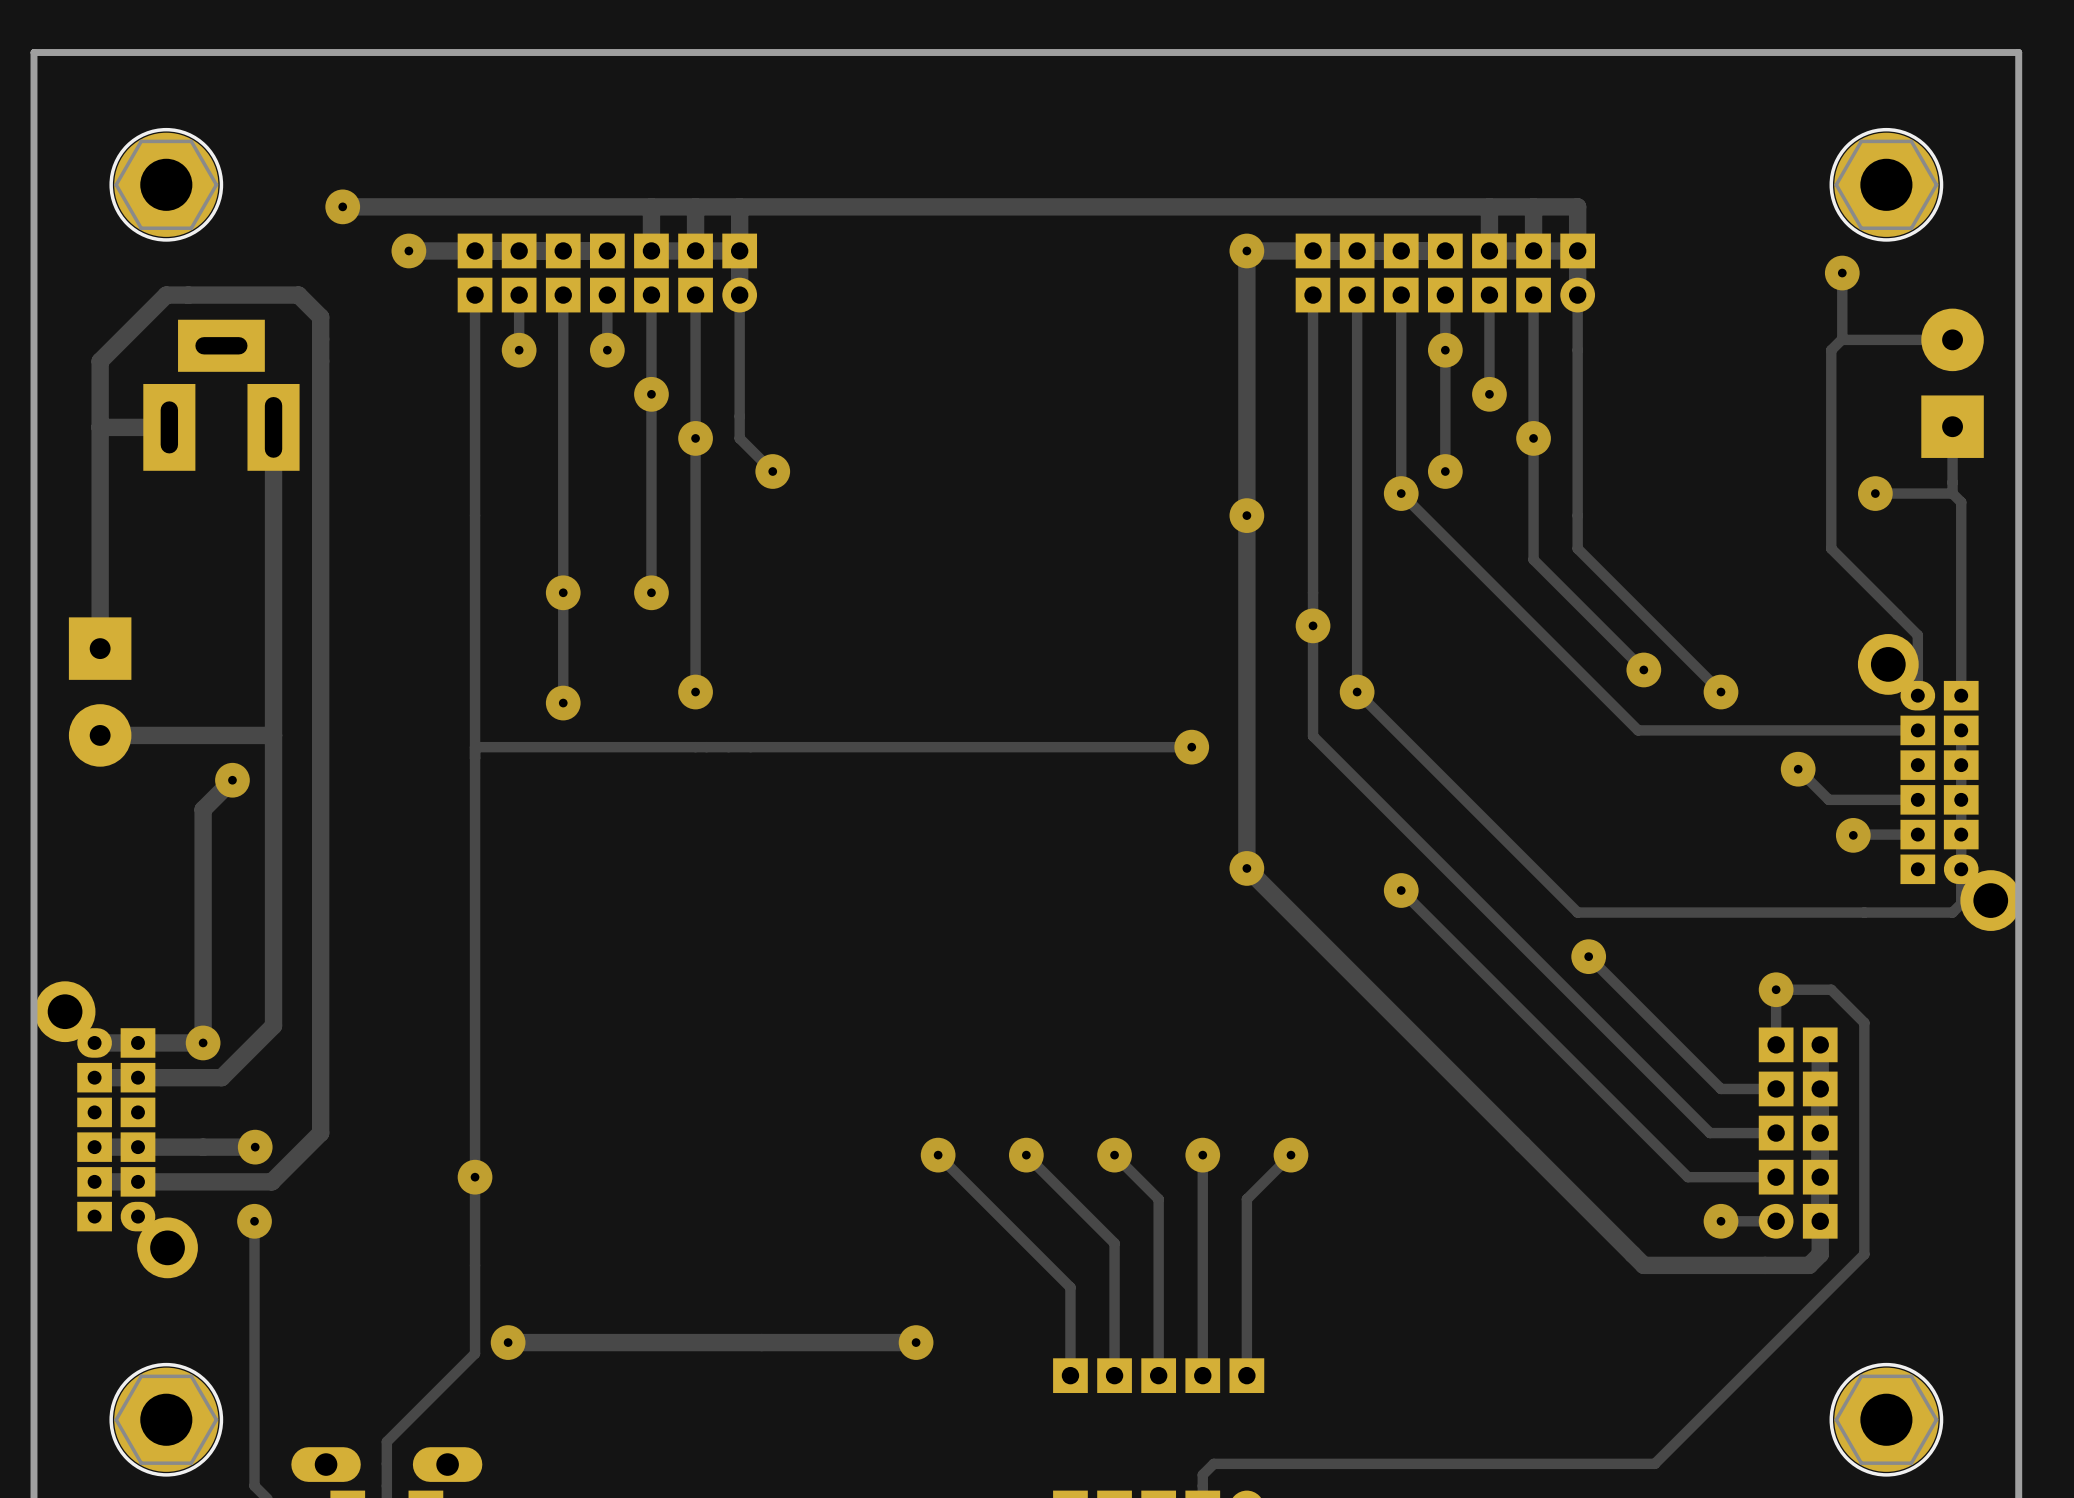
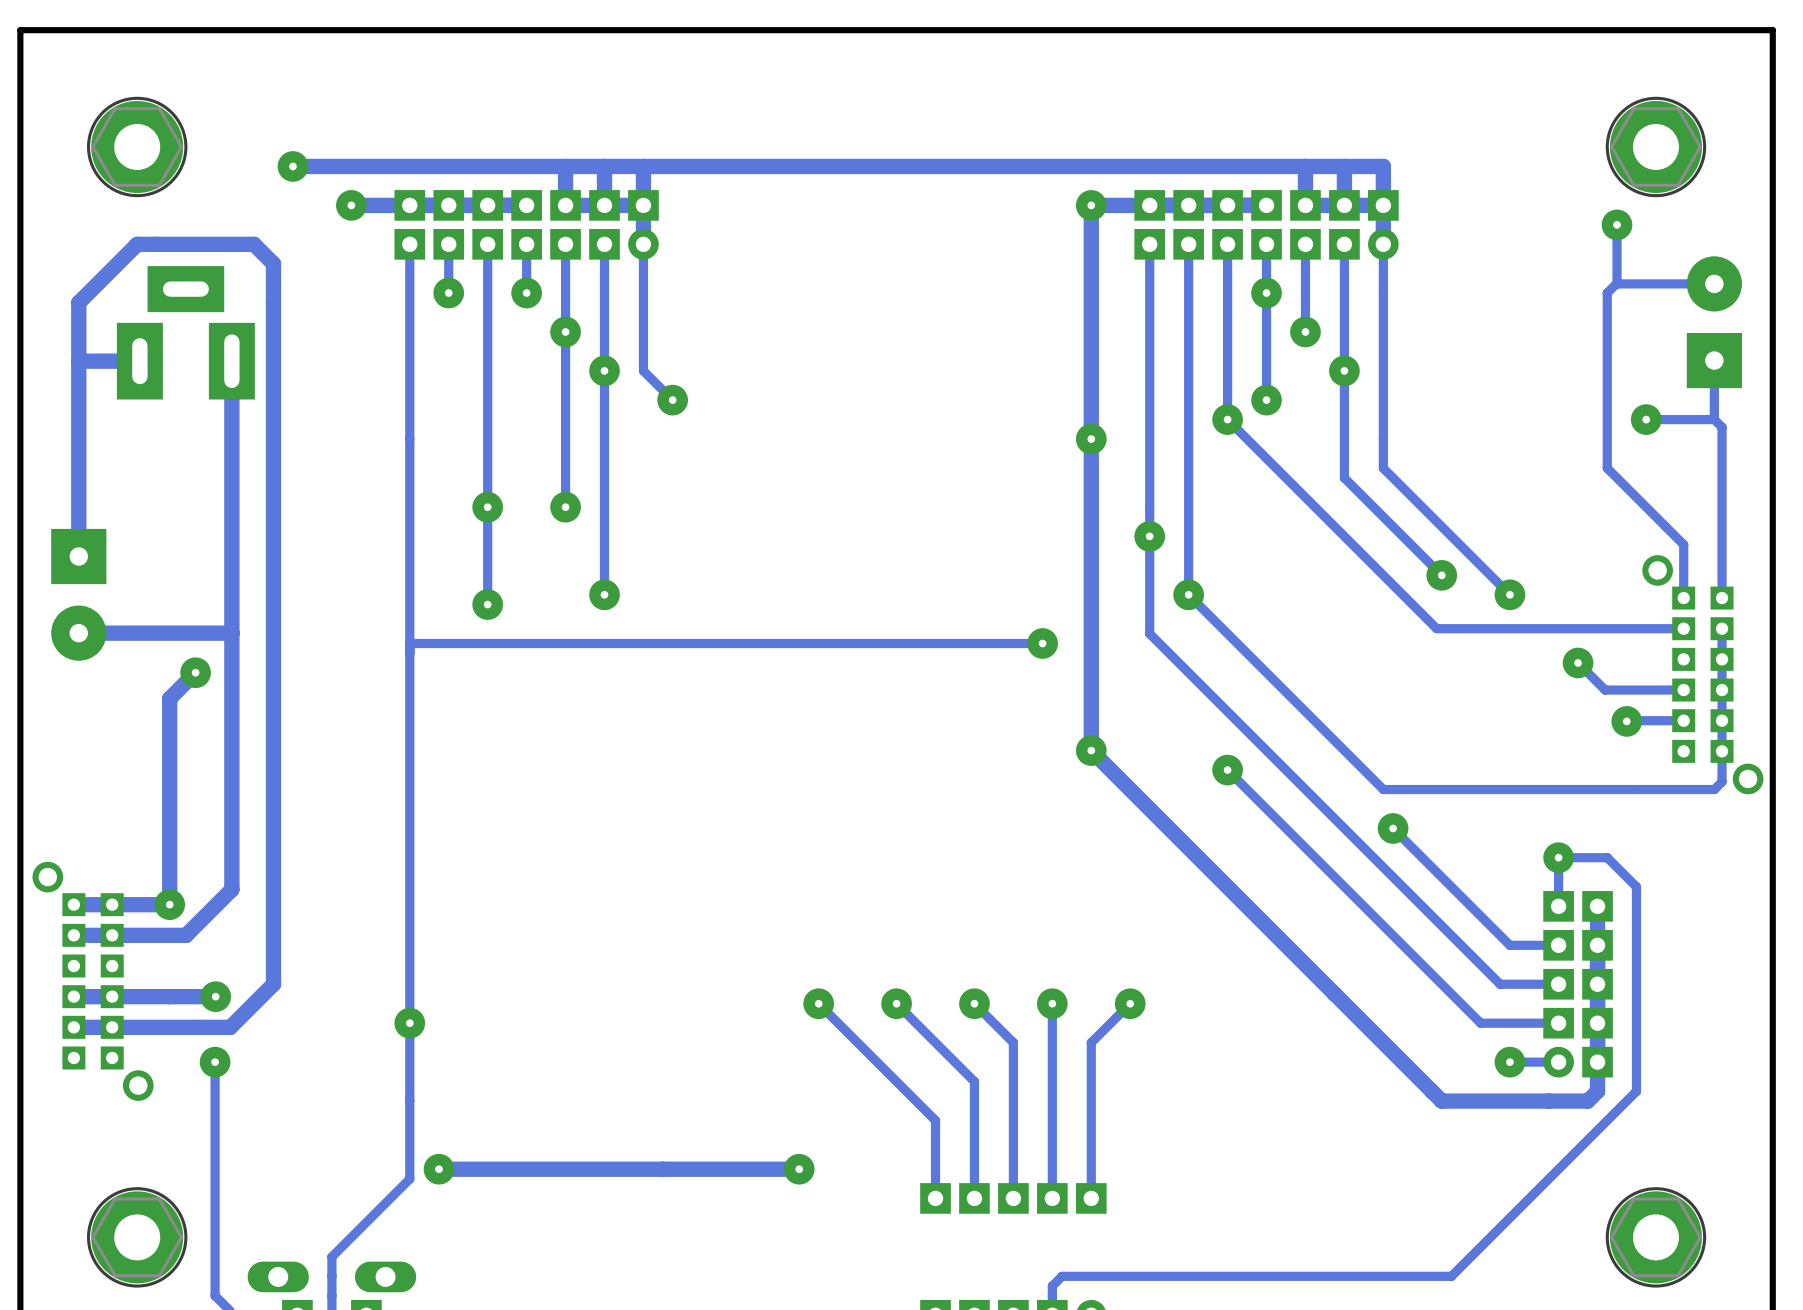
part footprint: [1857, 634, 2022, 931] -> [1642, 555, 1764, 795]
part footprint: [34, 981, 198, 1279] -> [32, 861, 154, 1101]

